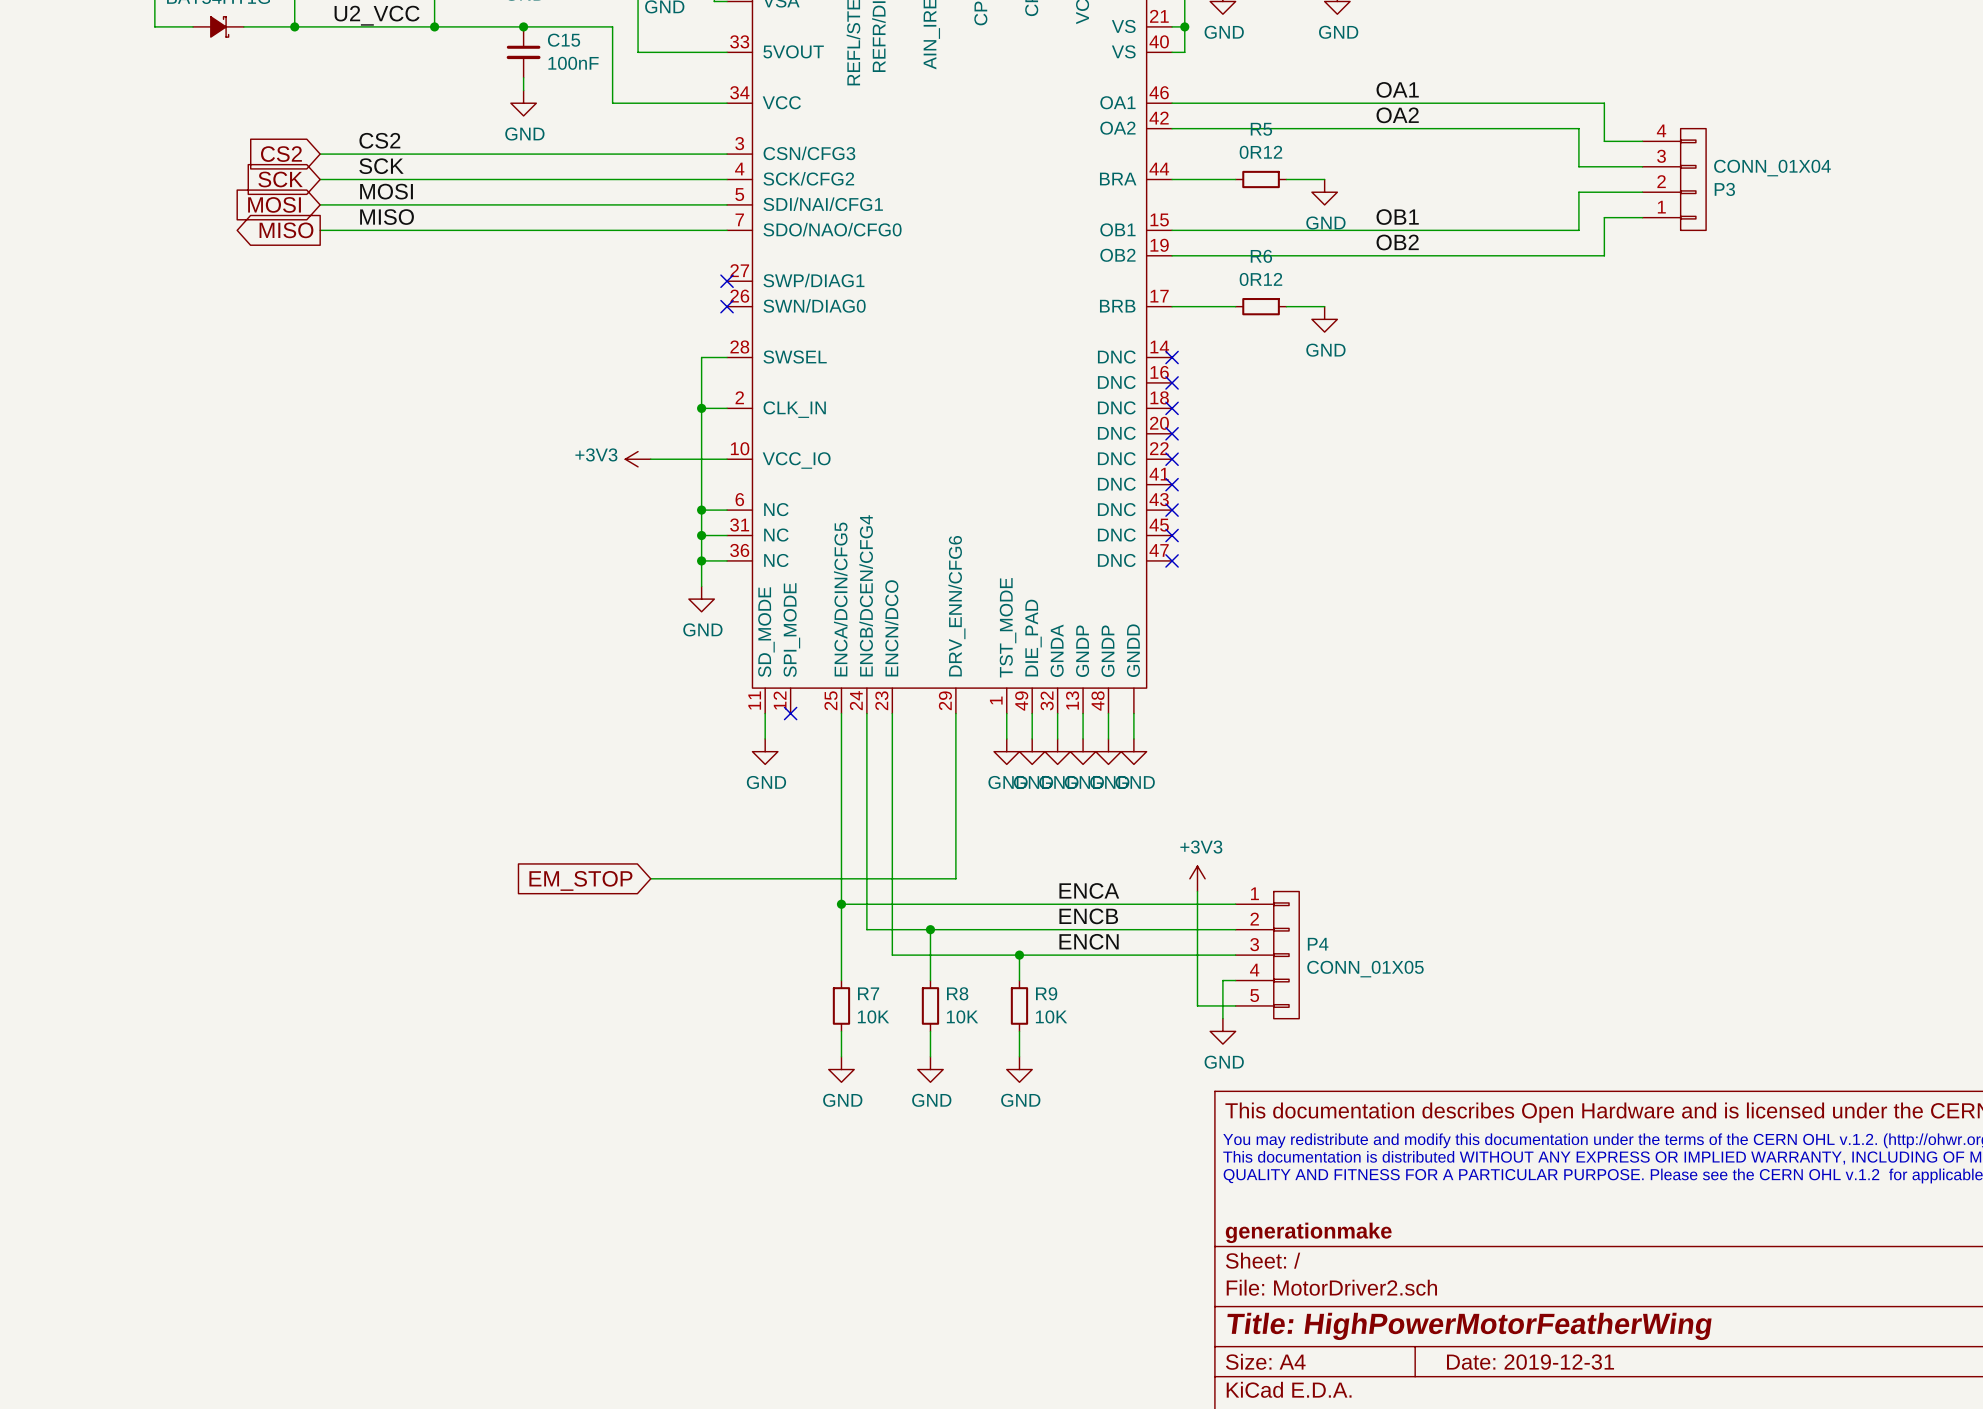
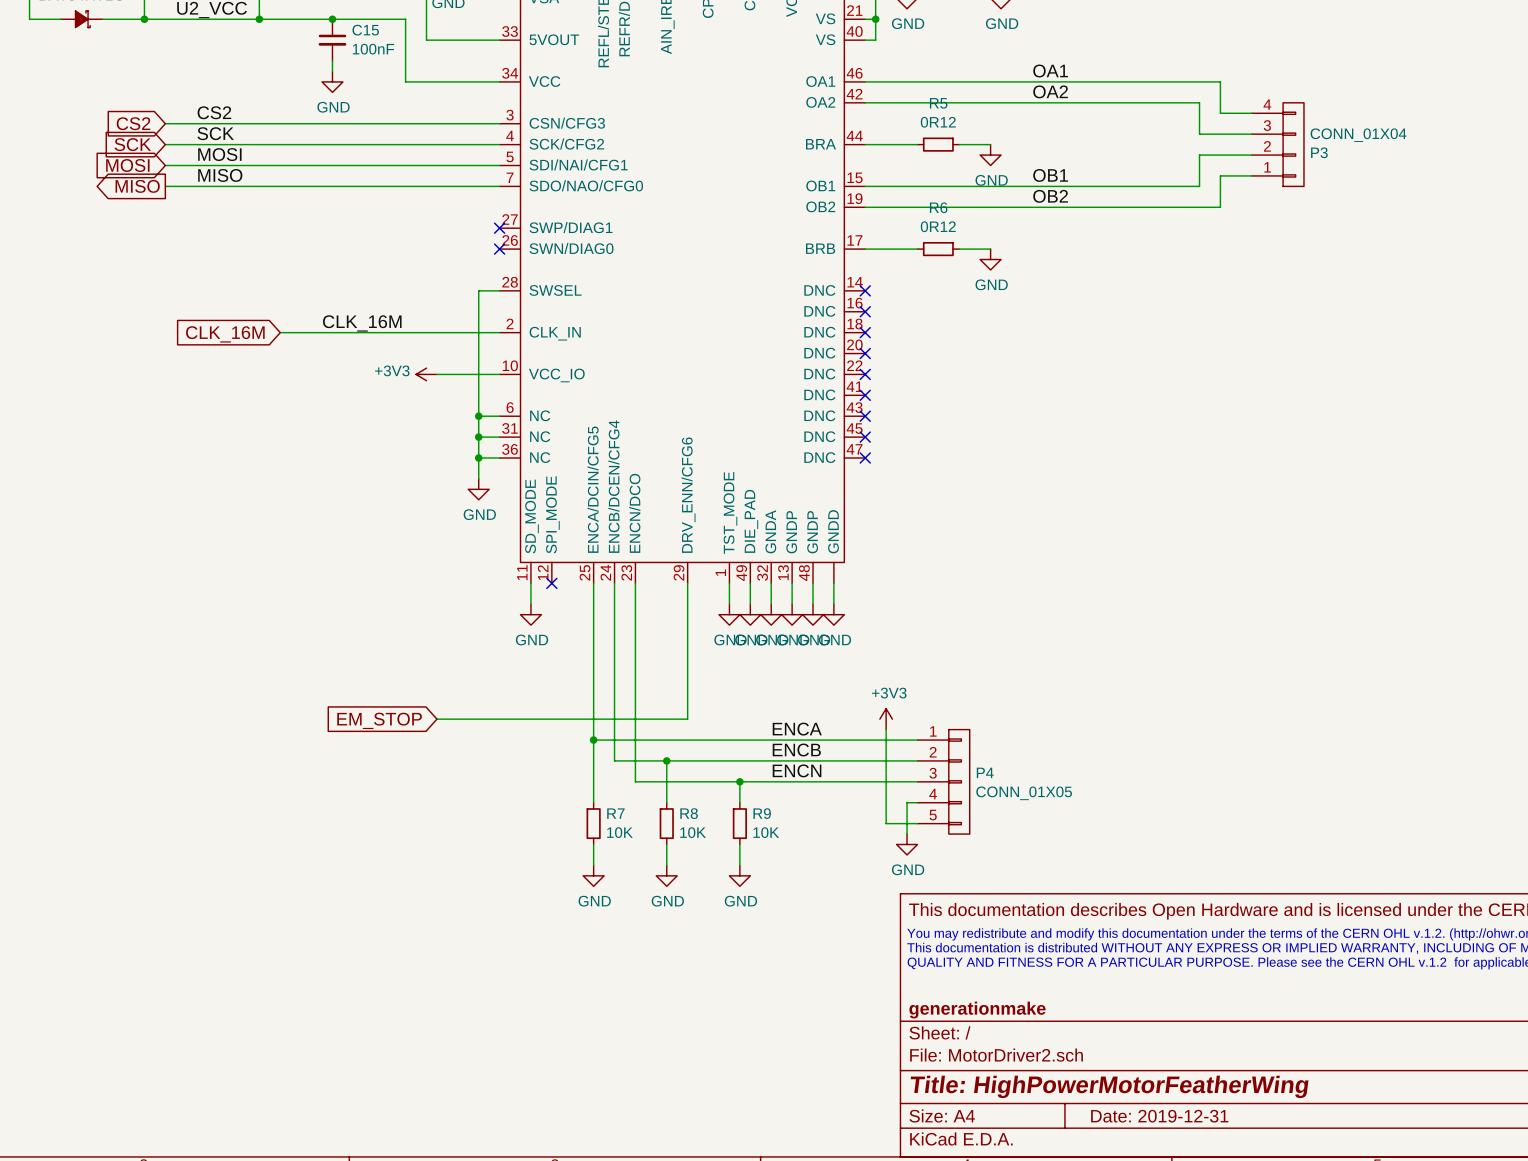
label: none -> CLK_16M (362, 323)
wire: none -> (280, 332) (478, 332)
junction: (701, 408) -> none
global label: none -> CLK_16M (225, 334)

